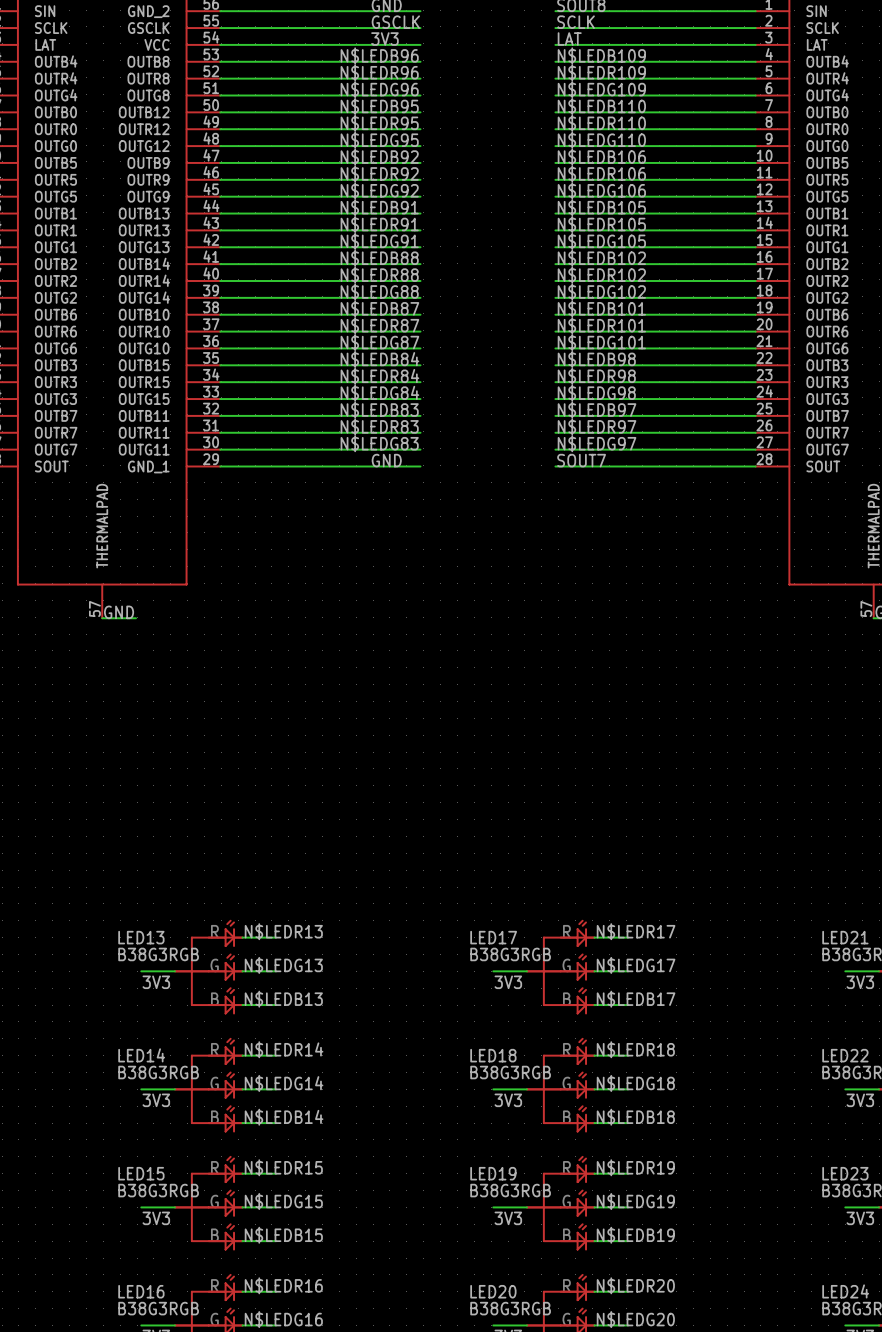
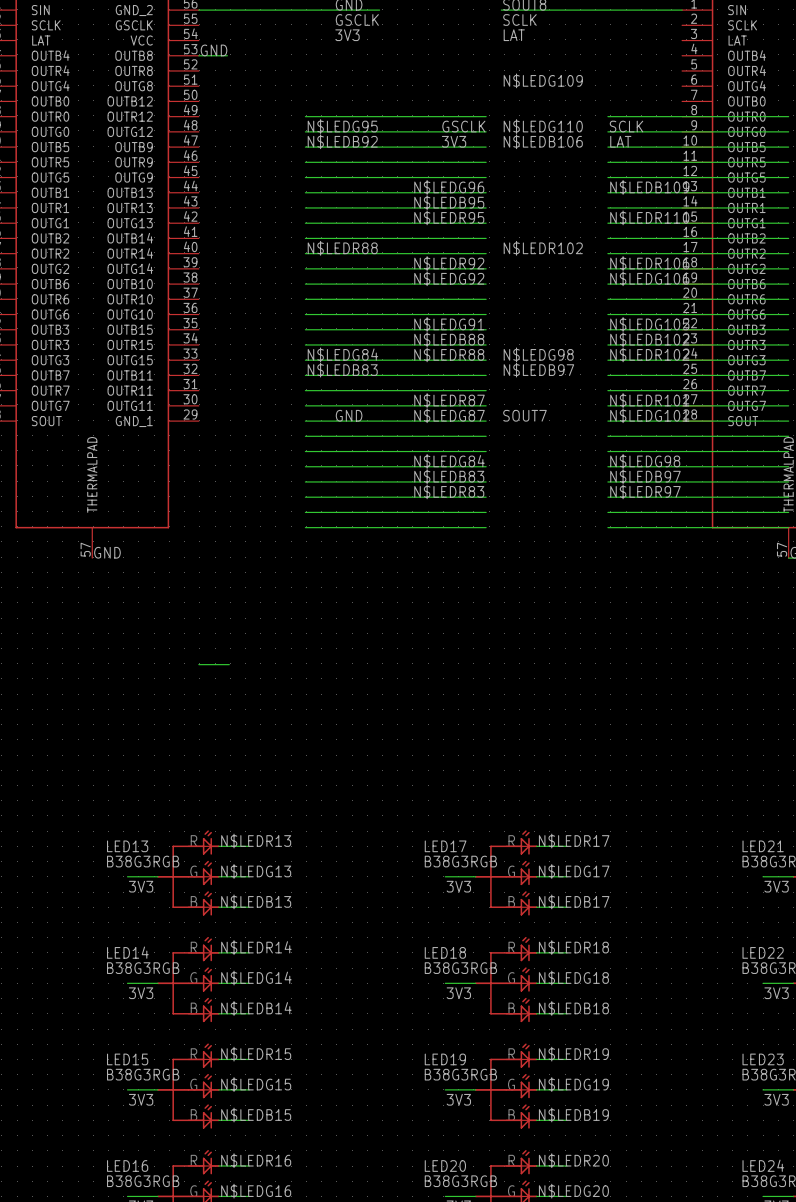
wire: (220, 28) (420, 28) -> none
wire: (555, 28) (755, 28) -> none
wire: (220, 44) (420, 44) -> none
wire: (555, 44) (755, 44) -> none
label: none -> GND (214, 50)
label: N$LEDB96 (379, 55) -> none
label: N$LEDB109 (601, 55) -> none
wire: (251, 61) (420, 61) -> none
wire: (555, 61) (755, 61) -> none
label: N$LEDR96 (379, 72) -> none
label: N$LEDR109 (601, 72) -> none
wire: (220, 78) (420, 78) -> none
wire: (555, 78) (755, 78) -> none
label: N$LEDG96 (379, 89) -> none
wire: (220, 95) (420, 95) -> none
wire: (555, 95) (755, 95) -> none
label: N$LEDB95 (379, 106) -> none
label: N$LEDB110 (601, 106) -> none
wire: (220, 112) (420, 112) -> none
wire: (555, 112) (755, 112) -> none
label: N$LEDR95 (379, 123) -> none
label: N$LEDR110 (601, 123) -> none
wire: (220, 129) (338, 129) -> none
wire: (555, 129) (673, 129) -> (379, 116) (486, 116)
wire: none -> (682, 116) (788, 116)
label: none -> GSCLK (463, 126)
label: none -> SCLK (626, 126)
wire: (220, 146) (338, 146) -> none
wire: (555, 146) (673, 146) -> (379, 131) (486, 131)
wire: none -> (682, 131) (788, 131)
label: none -> 3V3 (454, 141)
label: none -> LAT (620, 141)
wire: (220, 162) (338, 162) -> none
wire: (555, 162) (673, 162) -> (379, 147) (486, 147)
wire: none -> (682, 147) (788, 147)
label: N$LEDR92 (379, 173) -> none
label: N$LEDR106 (601, 173) -> none
wire: (220, 179) (338, 179) -> none
wire: (555, 179) (673, 179) -> (379, 162) (486, 162)
wire: none -> (682, 162) (788, 162)
label: N$LEDG92 (379, 190) -> none
label: N$LEDG106 (601, 190) -> none
wire: (220, 196) (338, 196) -> none
wire: (555, 196) (673, 196) -> (379, 177) (486, 177)
wire: none -> (682, 177) (788, 177)
label: N$LEDB91 (379, 207) -> none
label: none -> N$LEDG96 (449, 187)
label: N$LEDB105 (601, 207) -> none
label: none -> N$LEDB109 (649, 187)
wire: (220, 213) (338, 213) -> none
wire: (555, 213) (673, 213) -> (379, 192) (486, 192)
wire: none -> (682, 192) (788, 192)
label: N$LEDR91 (379, 224) -> none
label: none -> N$LEDB95 (449, 202)
label: N$LEDR105 (601, 224) -> none
wire: (220, 230) (338, 230) -> none
wire: (555, 230) (673, 230) -> (379, 207) (486, 207)
wire: none -> (682, 207) (788, 207)
label: N$LEDG91 (379, 241) -> none
label: none -> N$LEDR95 (449, 217)
label: N$LEDG105 (601, 241) -> none
label: none -> N$LEDR110 (649, 217)
wire: (220, 247) (338, 247) -> none
wire: (555, 247) (673, 247) -> (379, 223) (486, 223)
wire: none -> (682, 223) (788, 223)
label: N$LEDB88 (379, 258) -> none
label: N$LEDB102 (601, 258) -> none
wire: (220, 264) (338, 264) -> none
wire: (555, 264) (673, 264) -> (379, 238) (486, 238)
wire: none -> (682, 238) (788, 238)
wire: (220, 281) (338, 281) -> none
wire: (555, 281) (673, 281) -> (379, 253) (486, 253)
wire: none -> (682, 253) (788, 253)
label: N$LEDG88 (379, 291) -> none
label: none -> N$LEDR92 (449, 263)
label: N$LEDG102 (601, 291) -> none
label: none -> N$LEDR106 (649, 263)
wire: (220, 297) (338, 297) -> none
wire: (555, 297) (673, 297) -> (379, 268) (486, 268)
wire: none -> (682, 268) (788, 268)
label: N$LEDB87 (379, 308) -> none
label: none -> N$LEDG92 (449, 278)
label: N$LEDB101 (601, 308) -> none
label: none -> N$LEDG106 (649, 278)
wire: (220, 314) (338, 314) -> none
wire: (555, 314) (673, 314) -> (379, 284) (486, 284)
wire: none -> (682, 284) (788, 284)
label: N$LEDR87 (379, 325) -> none
label: N$LEDR101 (601, 325) -> none
wire: (220, 331) (338, 331) -> none
wire: (555, 331) (673, 331) -> (379, 299) (486, 299)
wire: none -> (682, 299) (788, 299)
label: N$LEDG87 (379, 342) -> none
label: N$LEDG101 (601, 342) -> none
wire: (220, 348) (338, 348) -> none
wire: (555, 348) (673, 348) -> (379, 314) (486, 314)
wire: none -> (682, 314) (788, 314)
label: N$LEDB84 (379, 359) -> none
label: none -> N$LEDG91 (449, 324)
label: N$LEDB98 (596, 359) -> none
label: none -> N$LEDG105 (649, 324)
wire: (220, 365) (338, 365) -> none
wire: (555, 365) (673, 365) -> (379, 329) (486, 329)
wire: none -> (682, 329) (788, 329)
label: N$LEDR84 (379, 376) -> none
label: none -> N$LEDB88 (449, 339)
label: N$LEDR98 (596, 376) -> none
label: none -> N$LEDB102 (649, 339)
wire: (220, 382) (338, 382) -> none
wire: (555, 382) (673, 382) -> (379, 344) (486, 344)
wire: none -> (682, 344) (788, 344)
label: none -> N$LEDR88 (449, 354)
label: none -> N$LEDR102 (649, 354)
wire: (220, 399) (338, 399) -> none
wire: (555, 399) (673, 399) -> (379, 360) (486, 360)
wire: none -> (682, 360) (788, 360)
wire: (220, 415) (338, 415) -> none
wire: (555, 415) (673, 415) -> (379, 375) (486, 375)
wire: none -> (682, 375) (788, 375)
label: N$LEDR83 (379, 426) -> none
label: N$LEDR97 (597, 426) -> none
wire: (220, 432) (338, 432) -> none
wire: (555, 432) (673, 432) -> (379, 390) (486, 390)
wire: none -> (682, 390) (788, 390)
label: N$LEDG83 (379, 443) -> none
label: none -> N$LEDR87 (449, 400)
label: N$LEDG97 (597, 443) -> none
label: none -> N$LEDR101 (649, 400)
wire: (220, 449) (338, 449) -> none
wire: (555, 449) (673, 449) -> (379, 405) (486, 405)
wire: none -> (682, 405) (788, 405)
label: none -> N$LEDG87 (449, 415)
label: none -> N$LEDG101 (649, 415)
wire: (220, 466) (338, 466) -> none
wire: (555, 466) (673, 466) -> (379, 421) (486, 421)
wire: none -> (682, 421) (788, 421)
wire: none -> (305, 436) (486, 436)
wire: none -> (607, 436) (788, 436)
wire: none -> (305, 451) (486, 451)
wire: none -> (607, 451) (788, 451)
label: none -> N$LEDG84 (449, 461)
label: none -> N$LEDG98 (645, 461)
wire: none -> (305, 466) (486, 466)
wire: none -> (607, 466) (788, 466)
label: none -> N$LEDB83 (449, 476)
label: none -> N$LEDB97 (645, 476)
wire: none -> (305, 481) (486, 481)
wire: none -> (607, 481) (788, 481)
label: none -> N$LEDR83 (449, 491)
label: none -> N$LEDR97 (645, 491)
wire: none -> (305, 497) (486, 497)
wire: none -> (607, 497) (788, 497)
wire: none -> (305, 512) (486, 512)
wire: none -> (607, 512) (788, 512)
wire: none -> (305, 527) (486, 527)
wire: none -> (607, 527) (788, 527)
wire: (102, 618) (135, 618) -> none
wire: none -> (198, 664) (229, 664)

